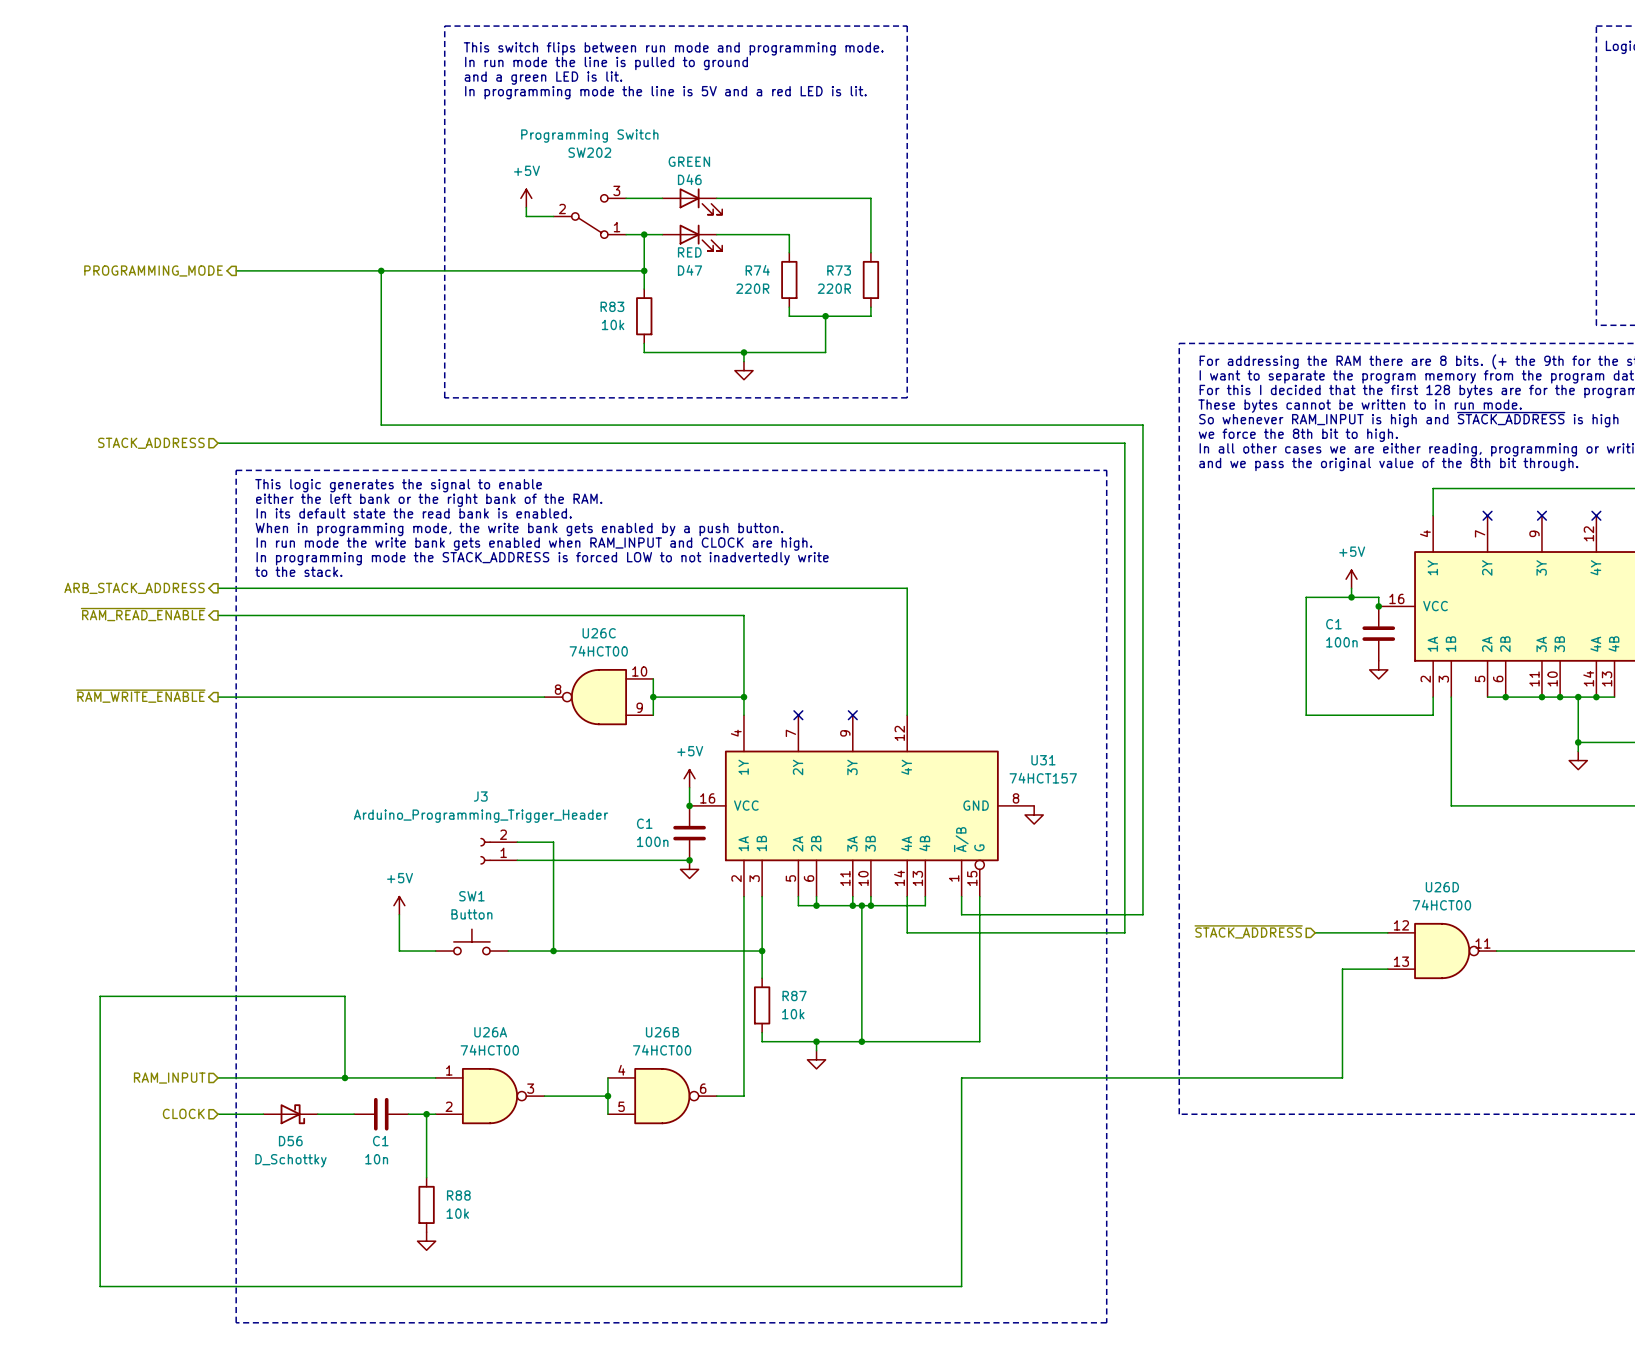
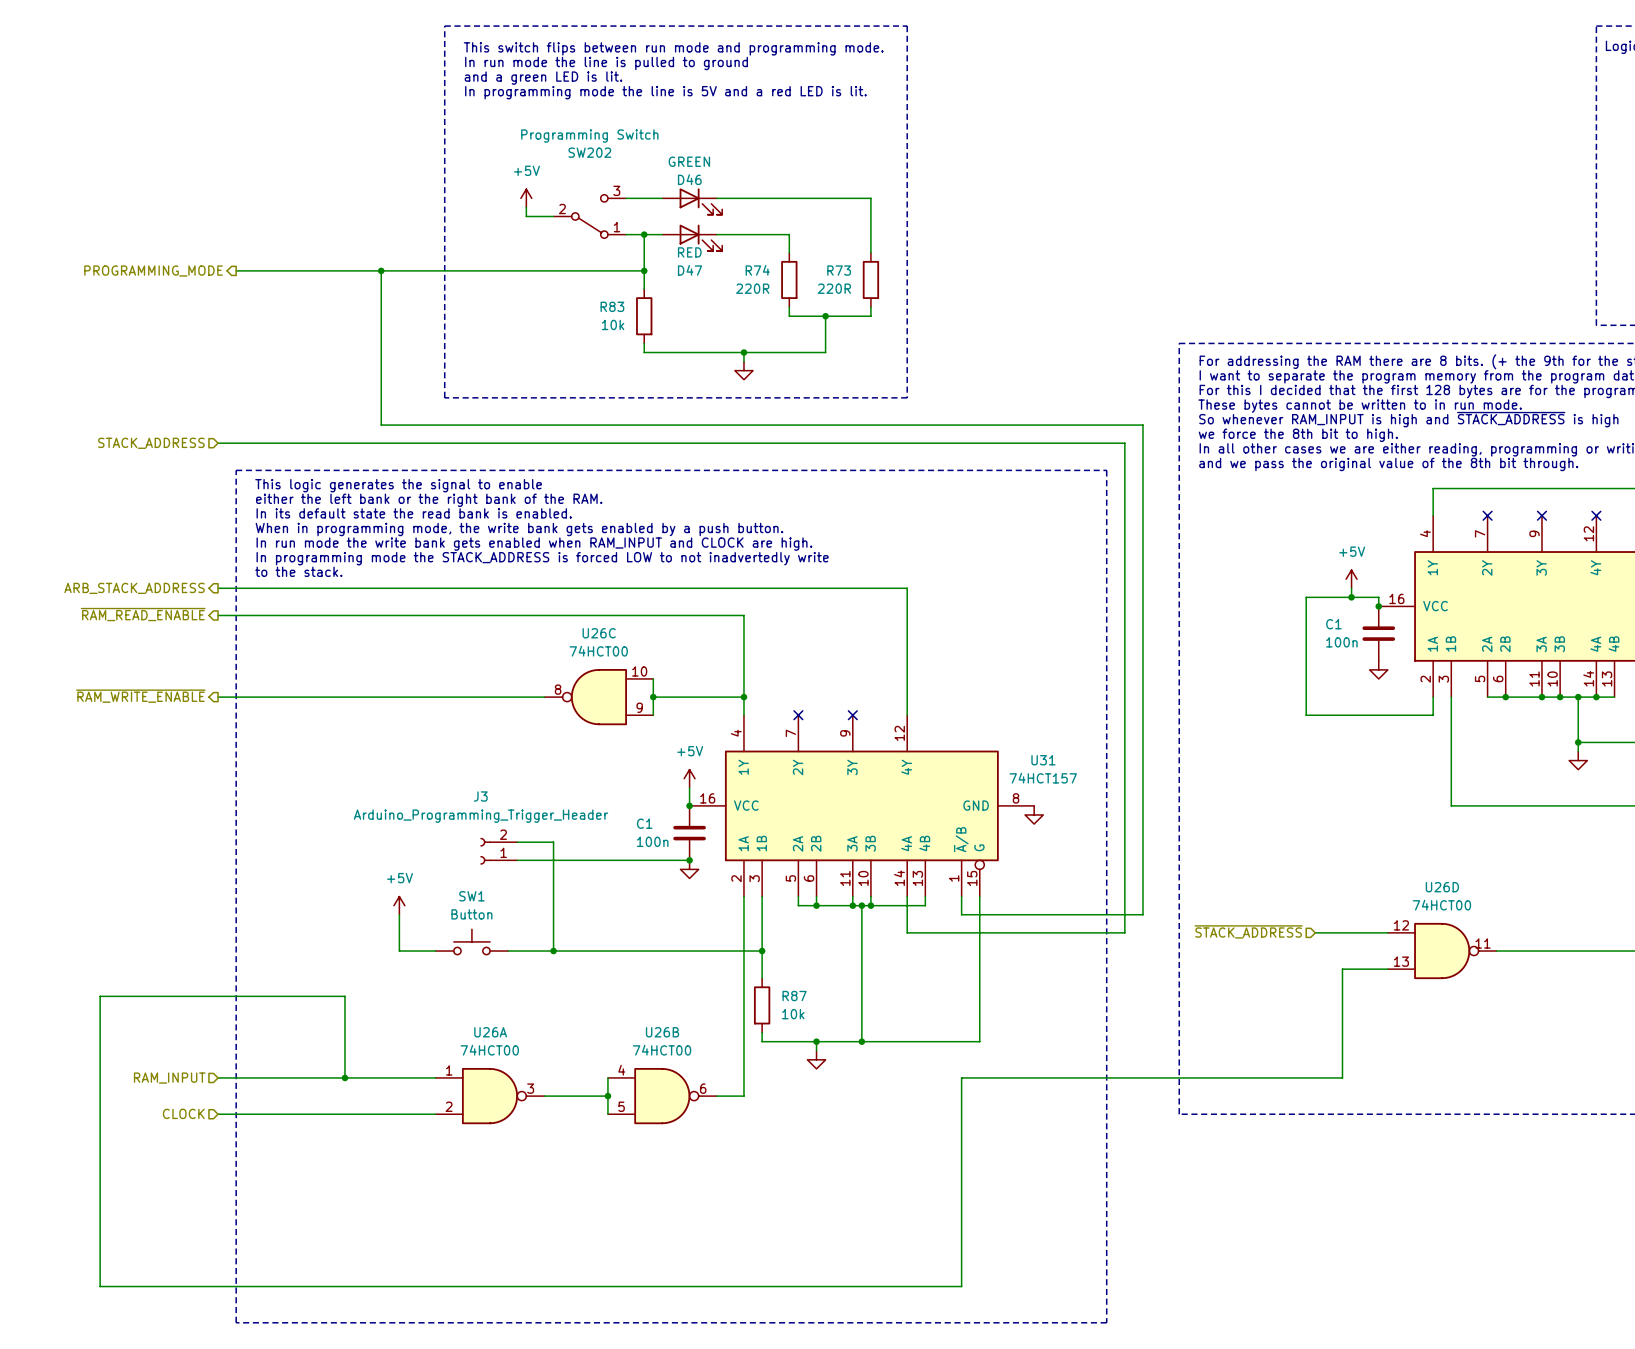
D56: D_Schottky (290, 1114) -> none
C1: 10n (381, 1114) -> none
wire: (426, 1114) (426, 1177) -> none
junction: (426, 1114) -> none
R88: 10k (426, 1204) -> none
power symbol: (426, 1241) -> none

